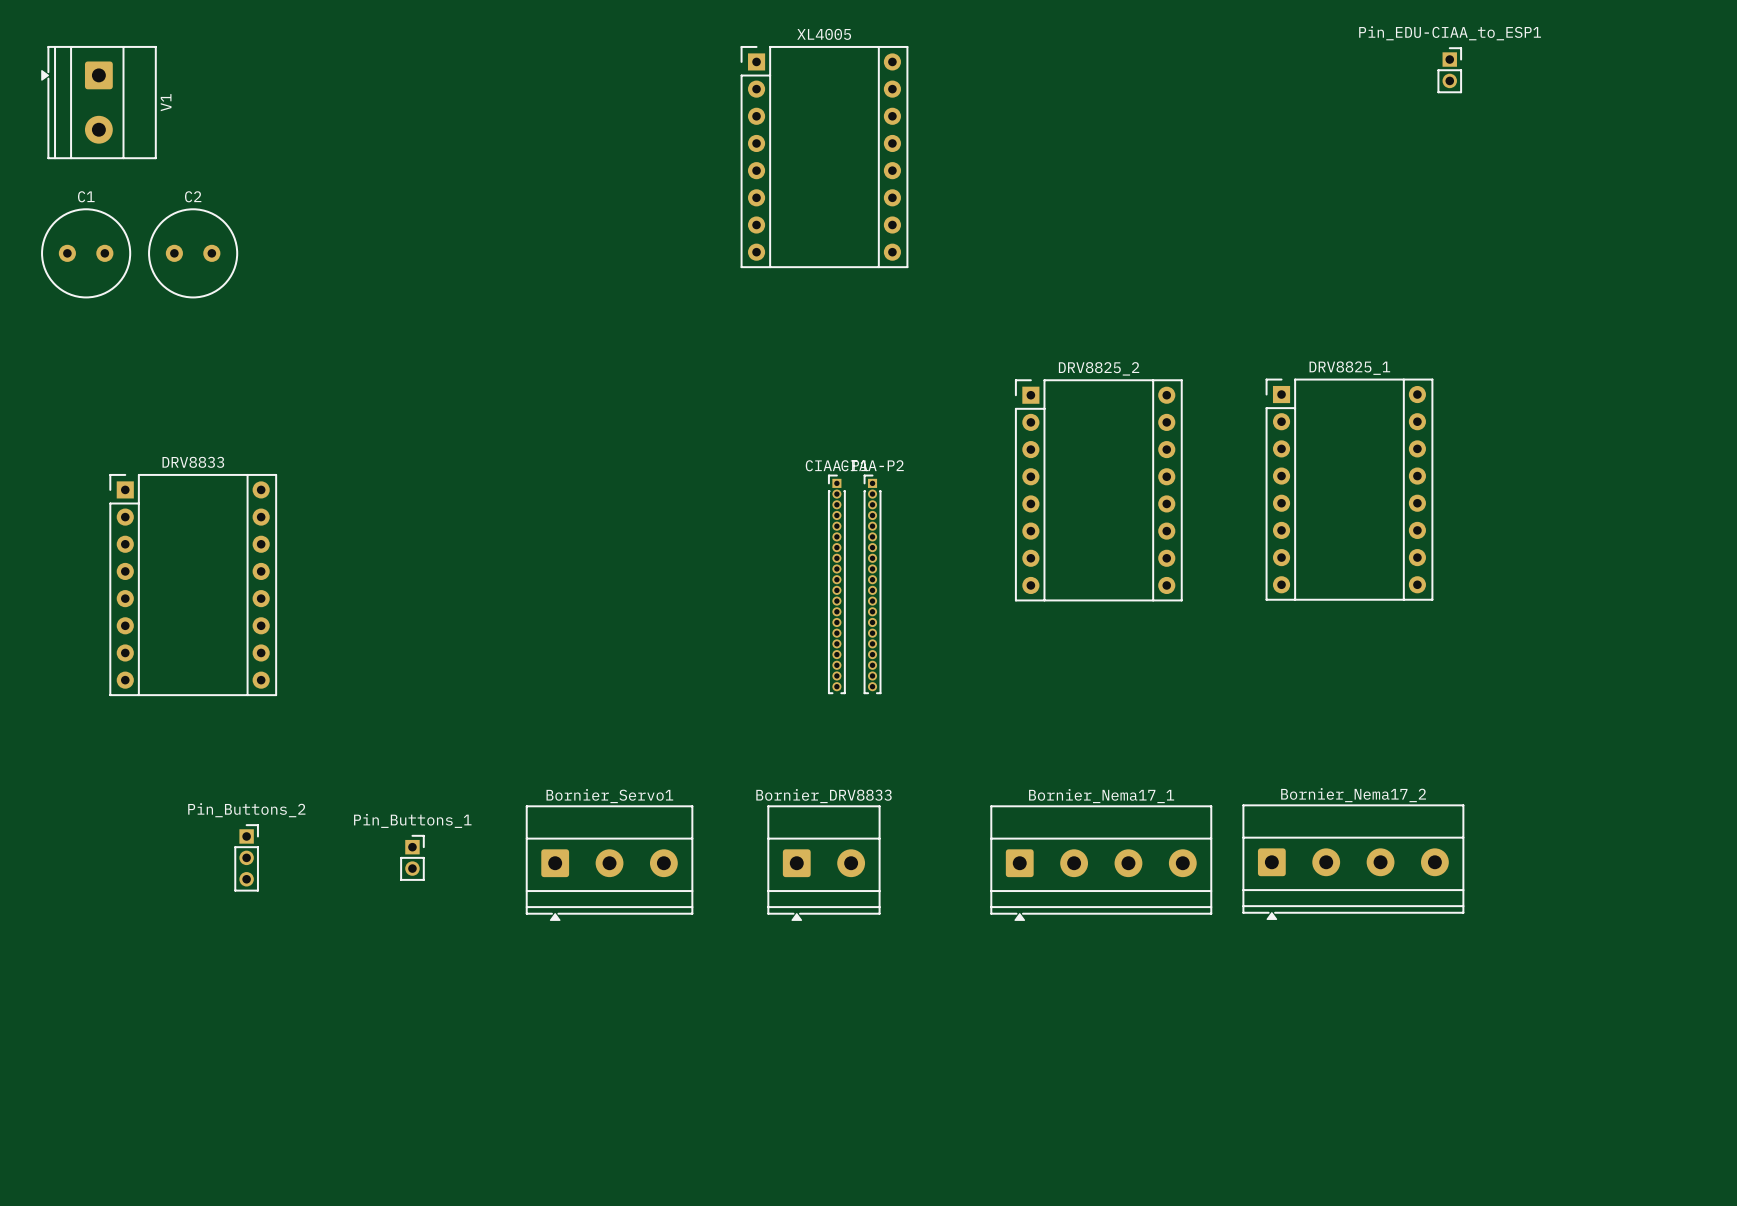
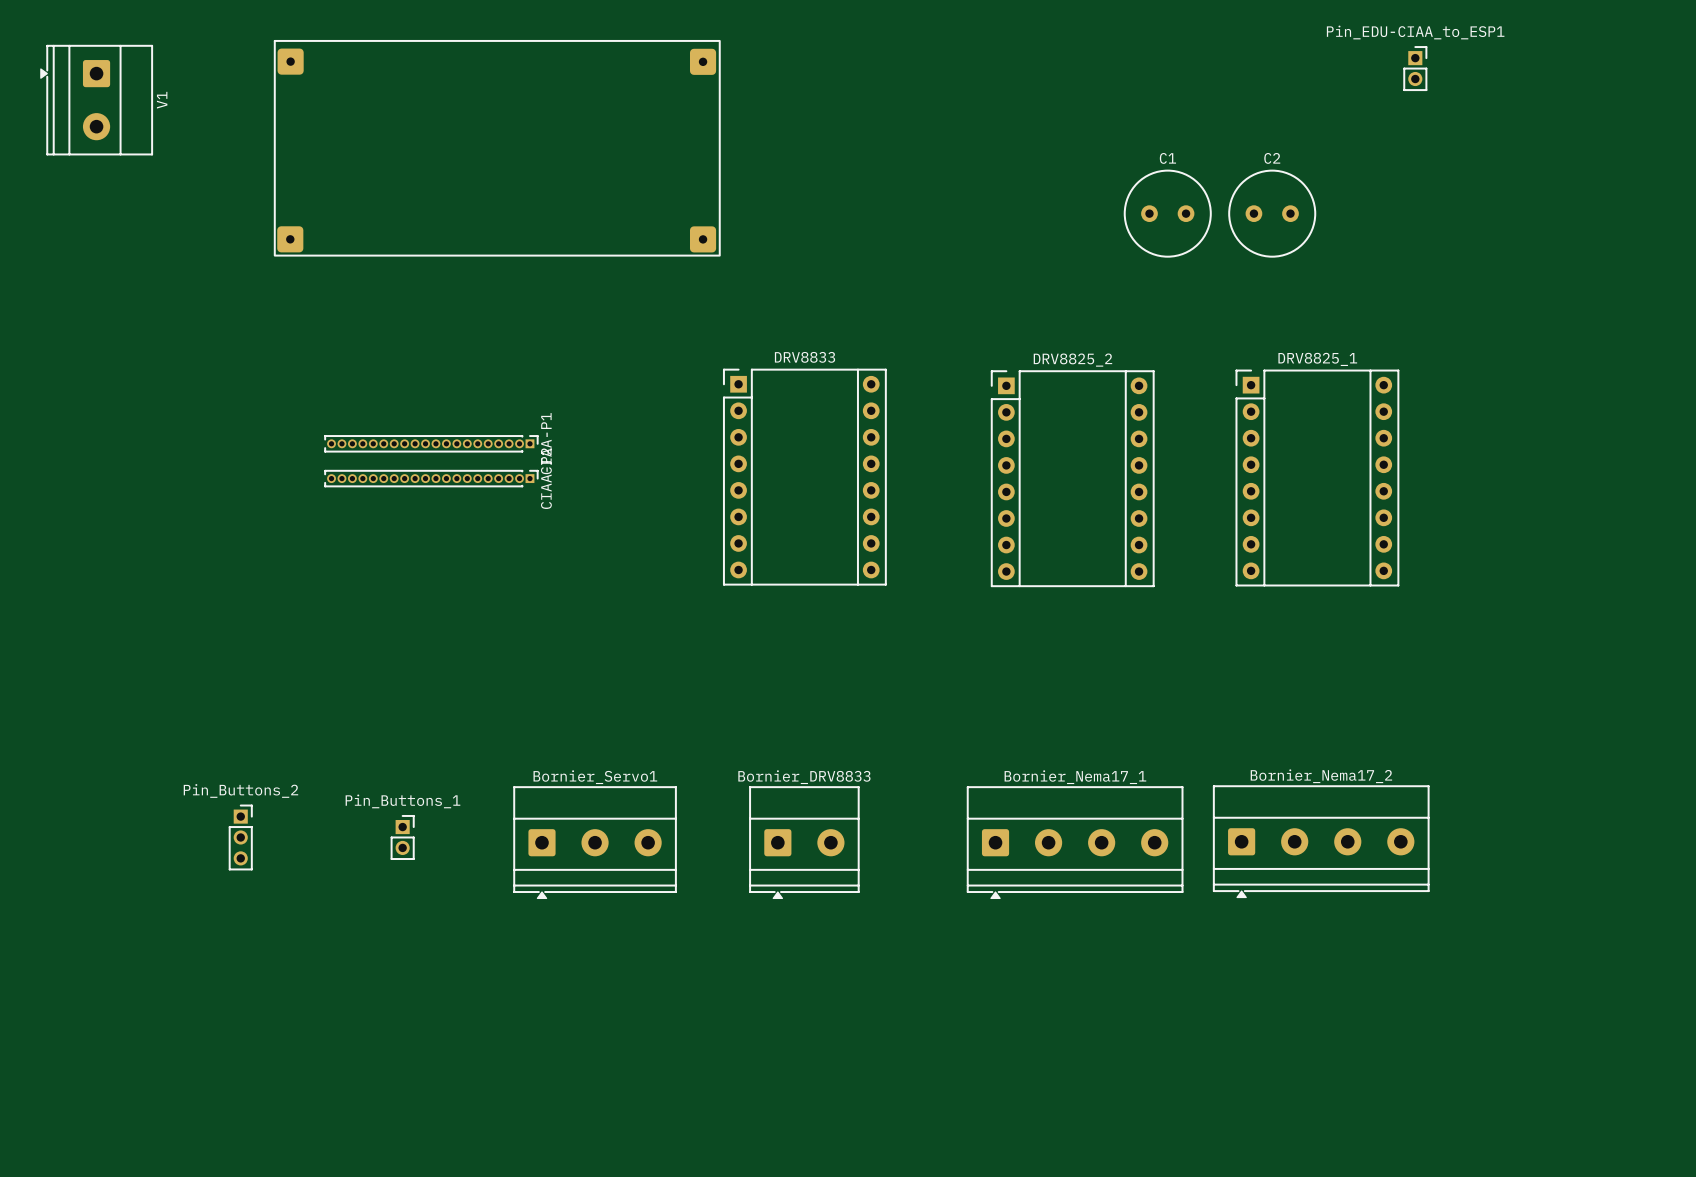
part: none -> (497, 148)
XL4005: (824, 157) -> none
C1 position: (86, 253) -> (1167, 213)
C2 position: (193, 253) -> (1272, 213)
CIAA-P1 rotation: 0° (836, 584) -> 90° clockwise (431, 443)
CIAA-P1 position: (836, 584) -> (431, 443)
CIAA-P2 rotation: 0° (872, 584) -> 90° clockwise (431, 478)
CIAA-P2 position: (872, 584) -> (431, 478)
DRV8833 position: (193, 585) -> (804, 477)

